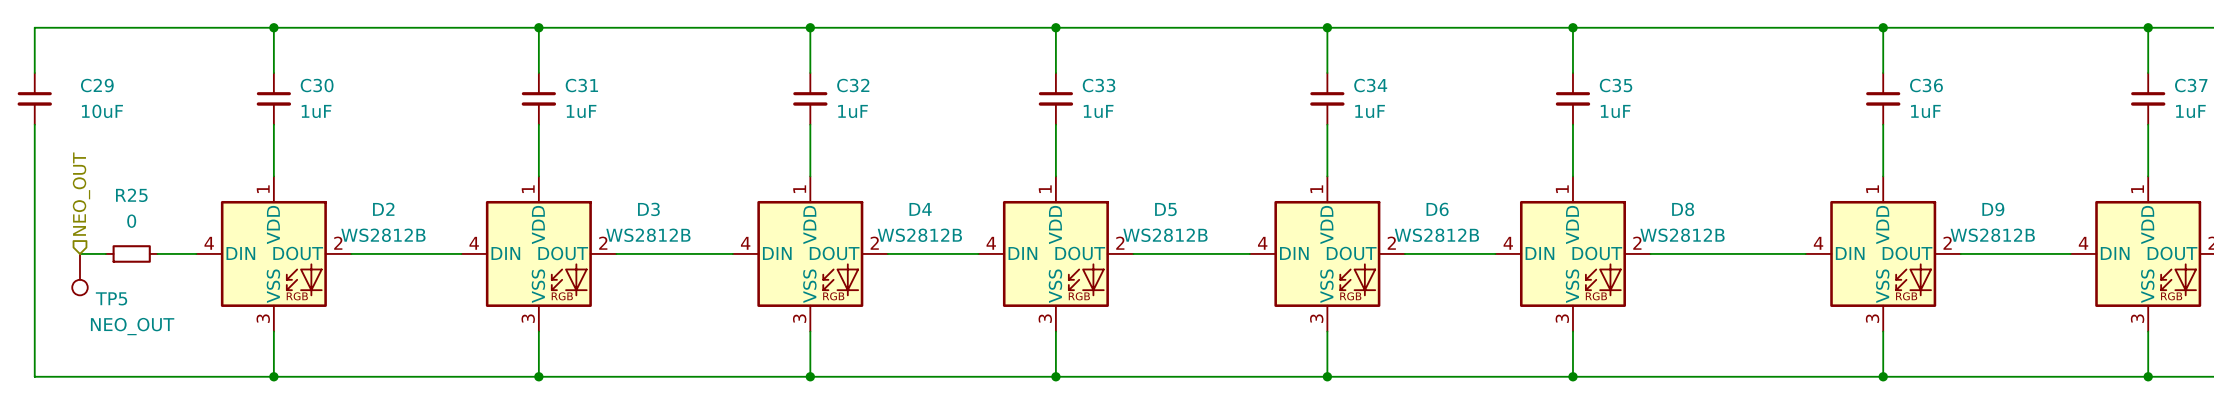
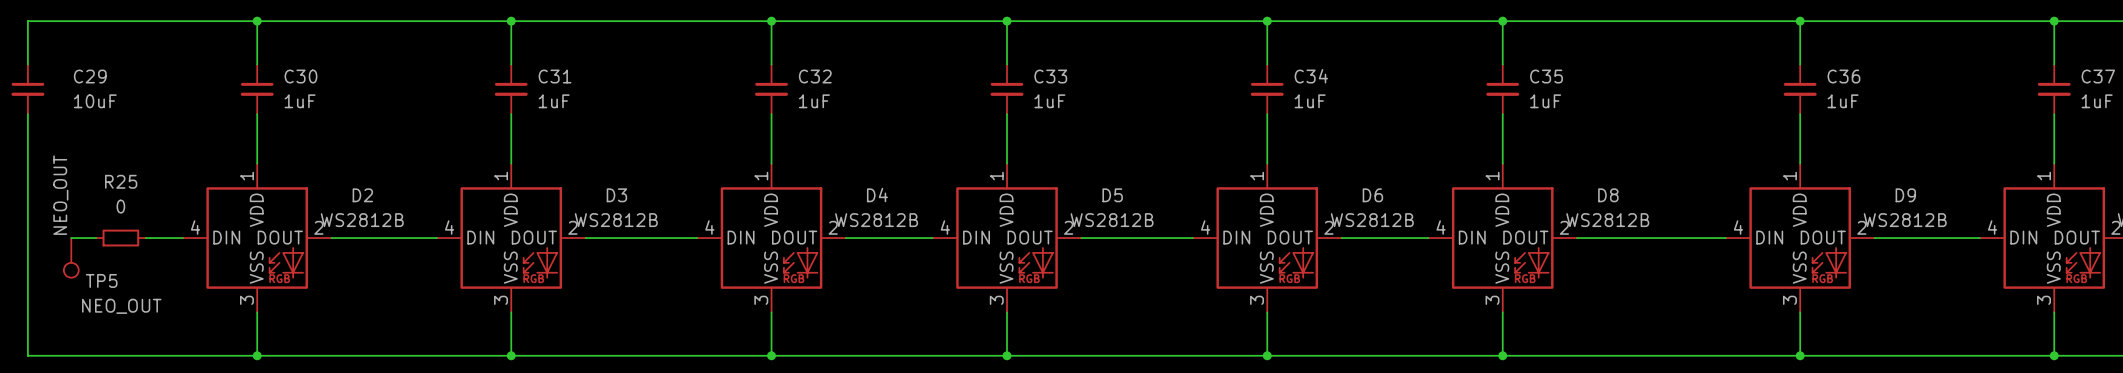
hierarchical label: NEO_OUT (81, 194) -> none
label: none -> NEO_OUT (60, 195)

